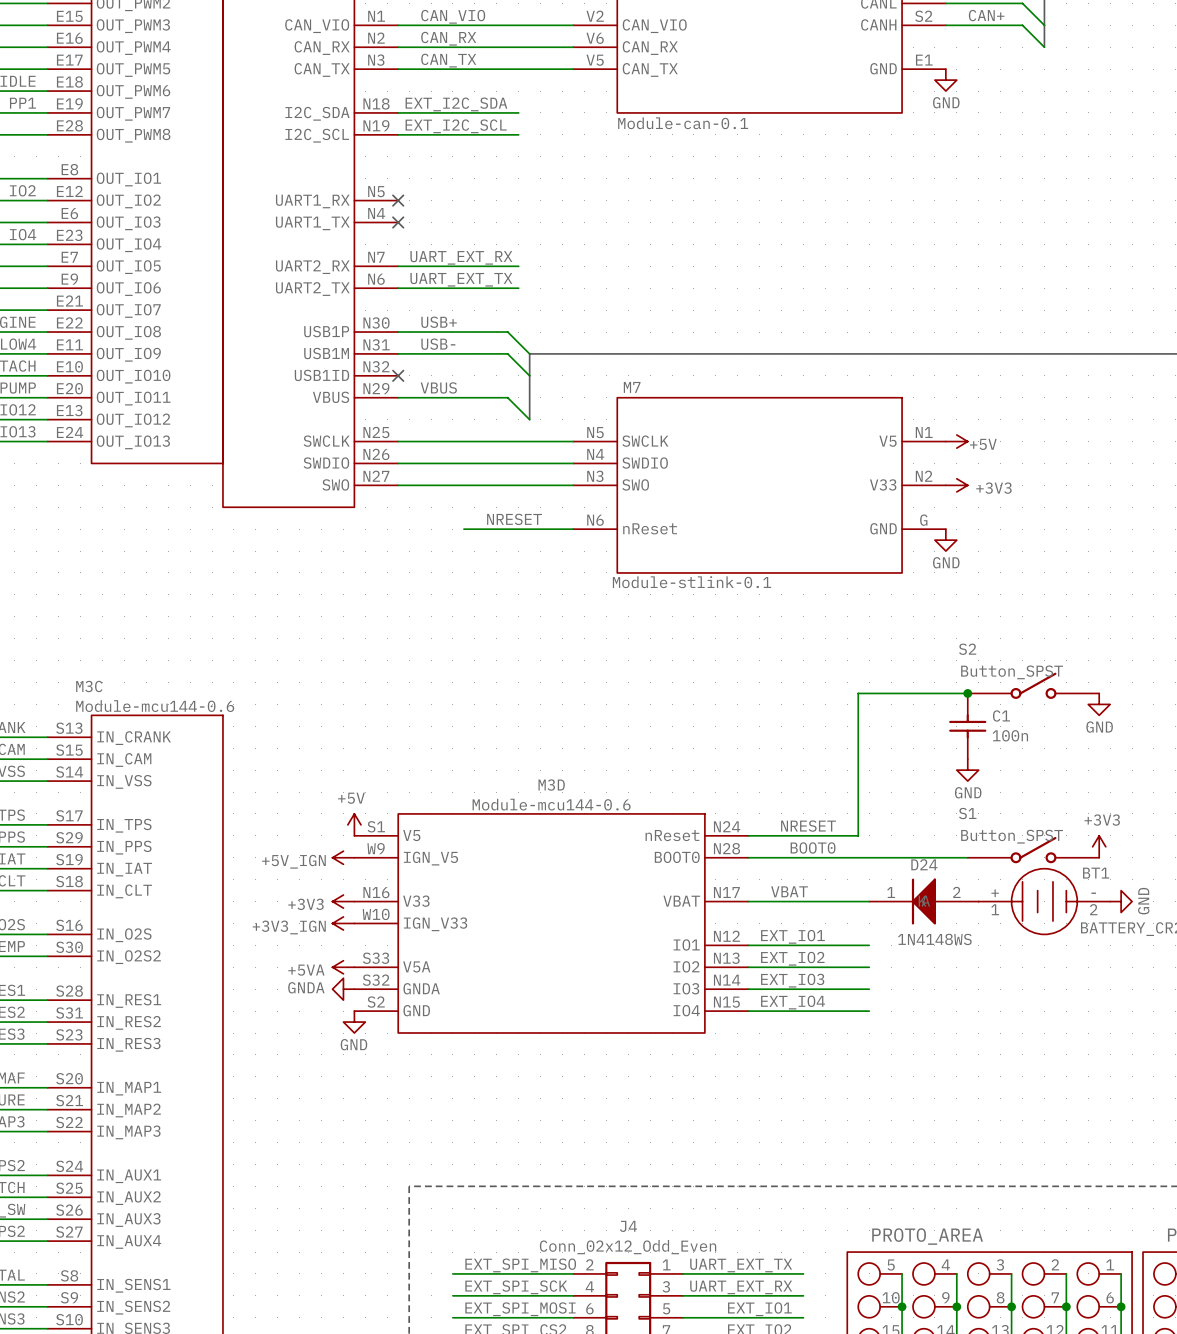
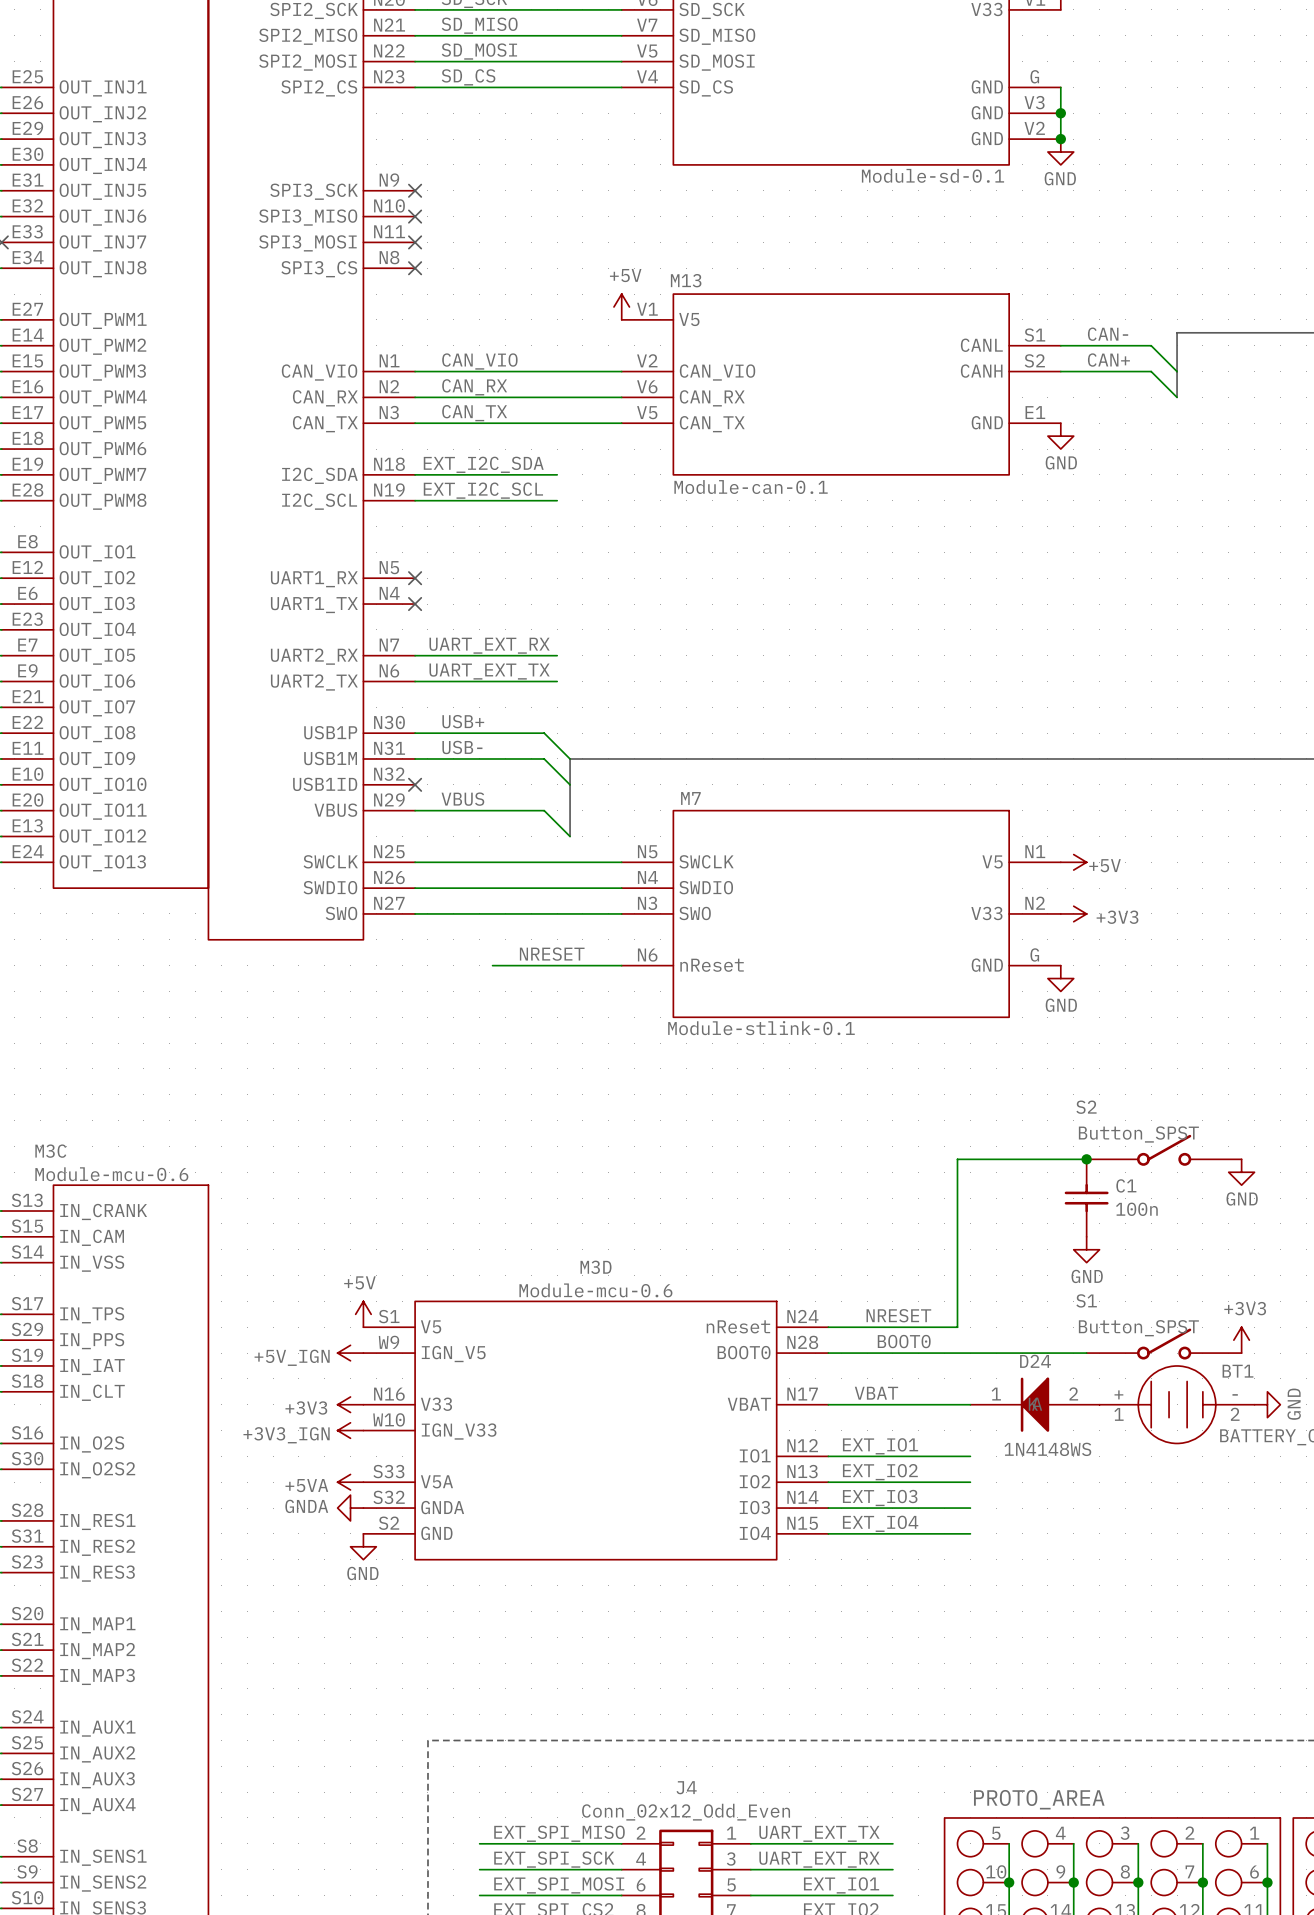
M3C value: Module-mcu144-0.6 (155, 706) -> Module-mcu-0.6 (111, 1174)
M3D value: Module-mcu144-0.6 (551, 804) -> Module-mcu-0.6 (595, 1290)

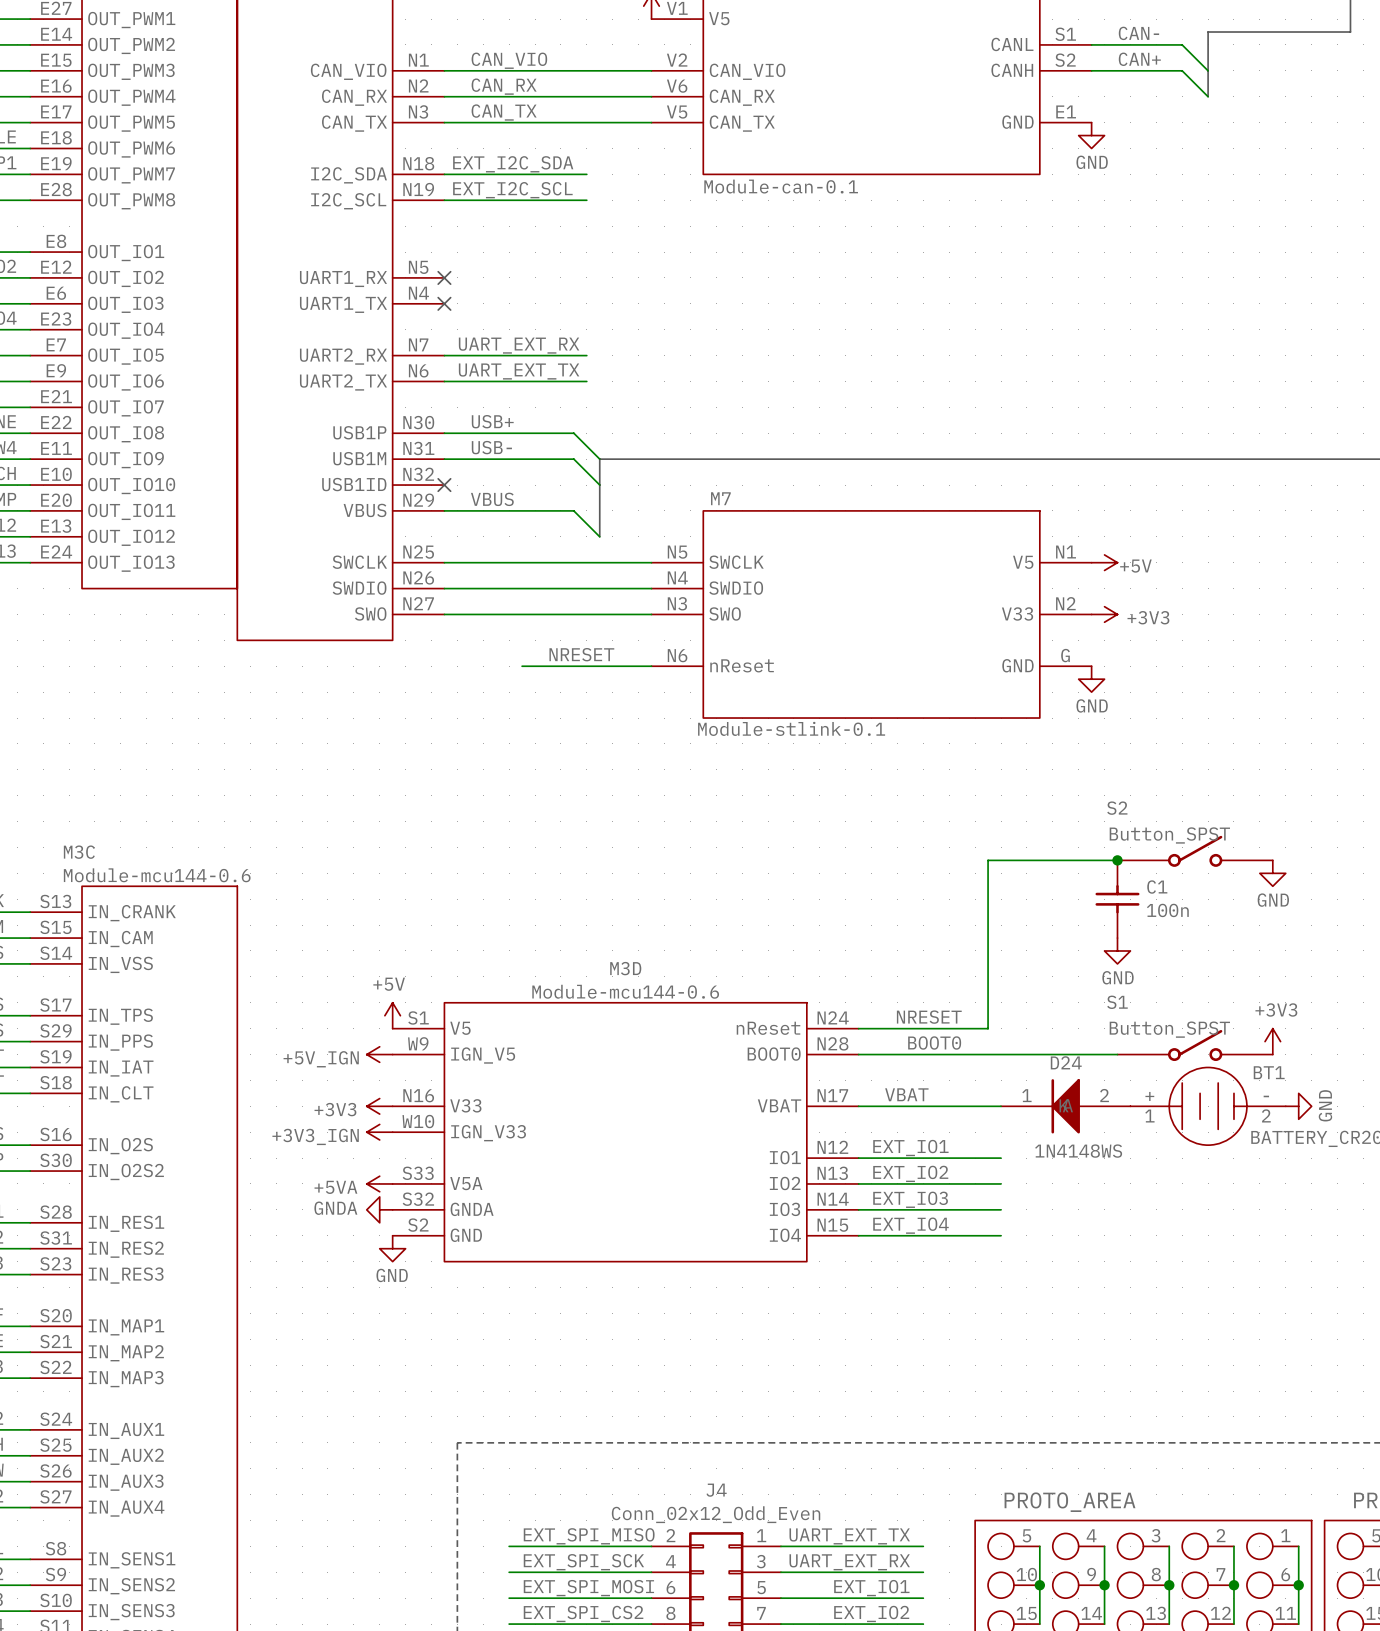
M3C value: Module-mcu-0.6 (111, 1174) -> Module-mcu144-0.6 (157, 875)
M3D value: Module-mcu-0.6 (595, 1290) -> Module-mcu144-0.6 (625, 991)

